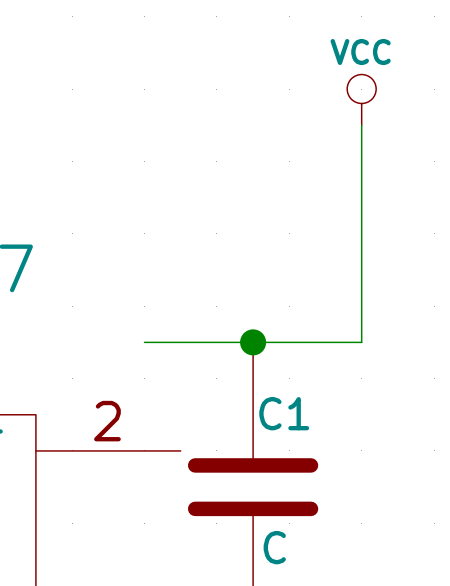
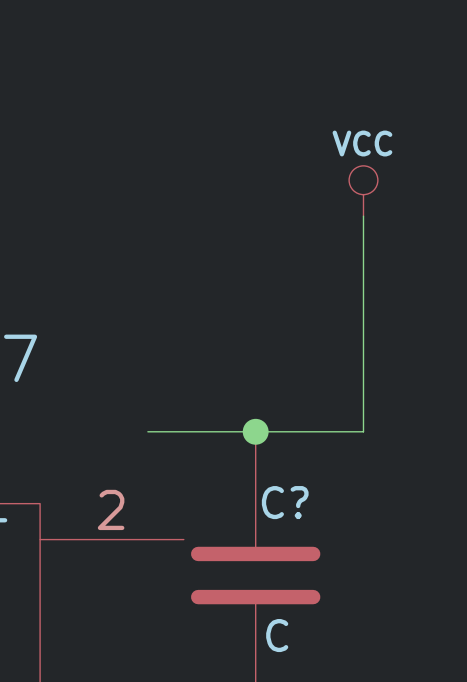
C1 name: C1 (284, 413) -> C? (285, 502)

